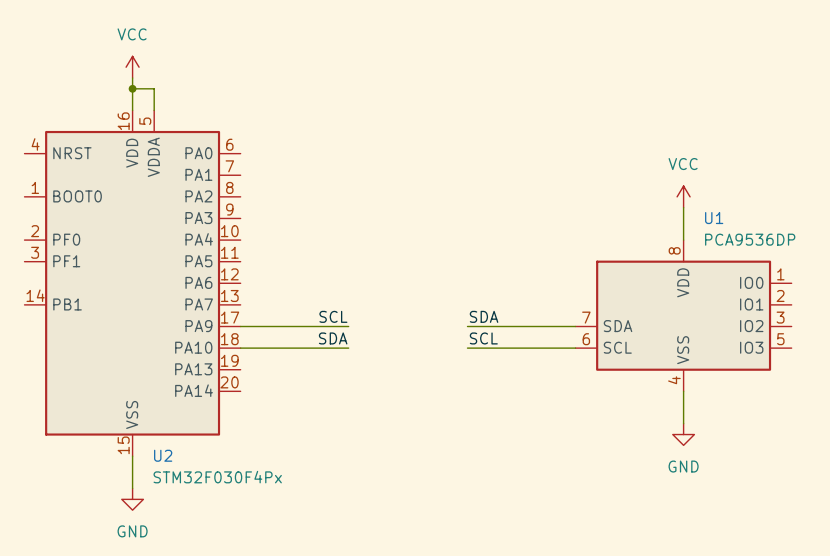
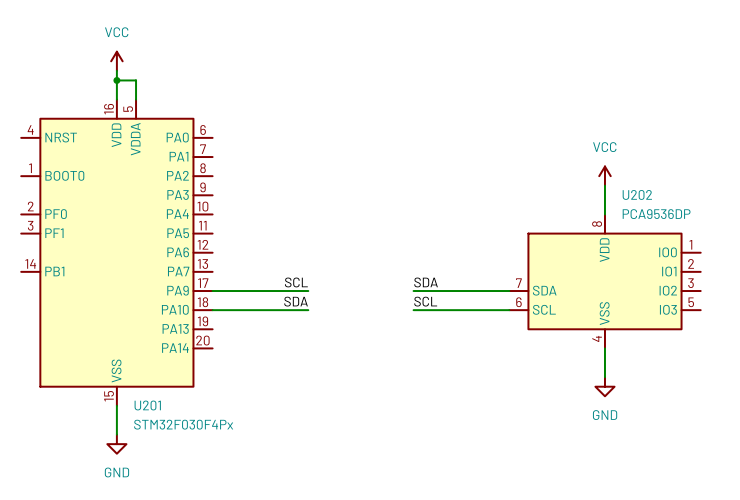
U1 name: U1 (714, 218) -> U202 (637, 194)
U2 name: U2 (163, 455) -> U201 (147, 405)

